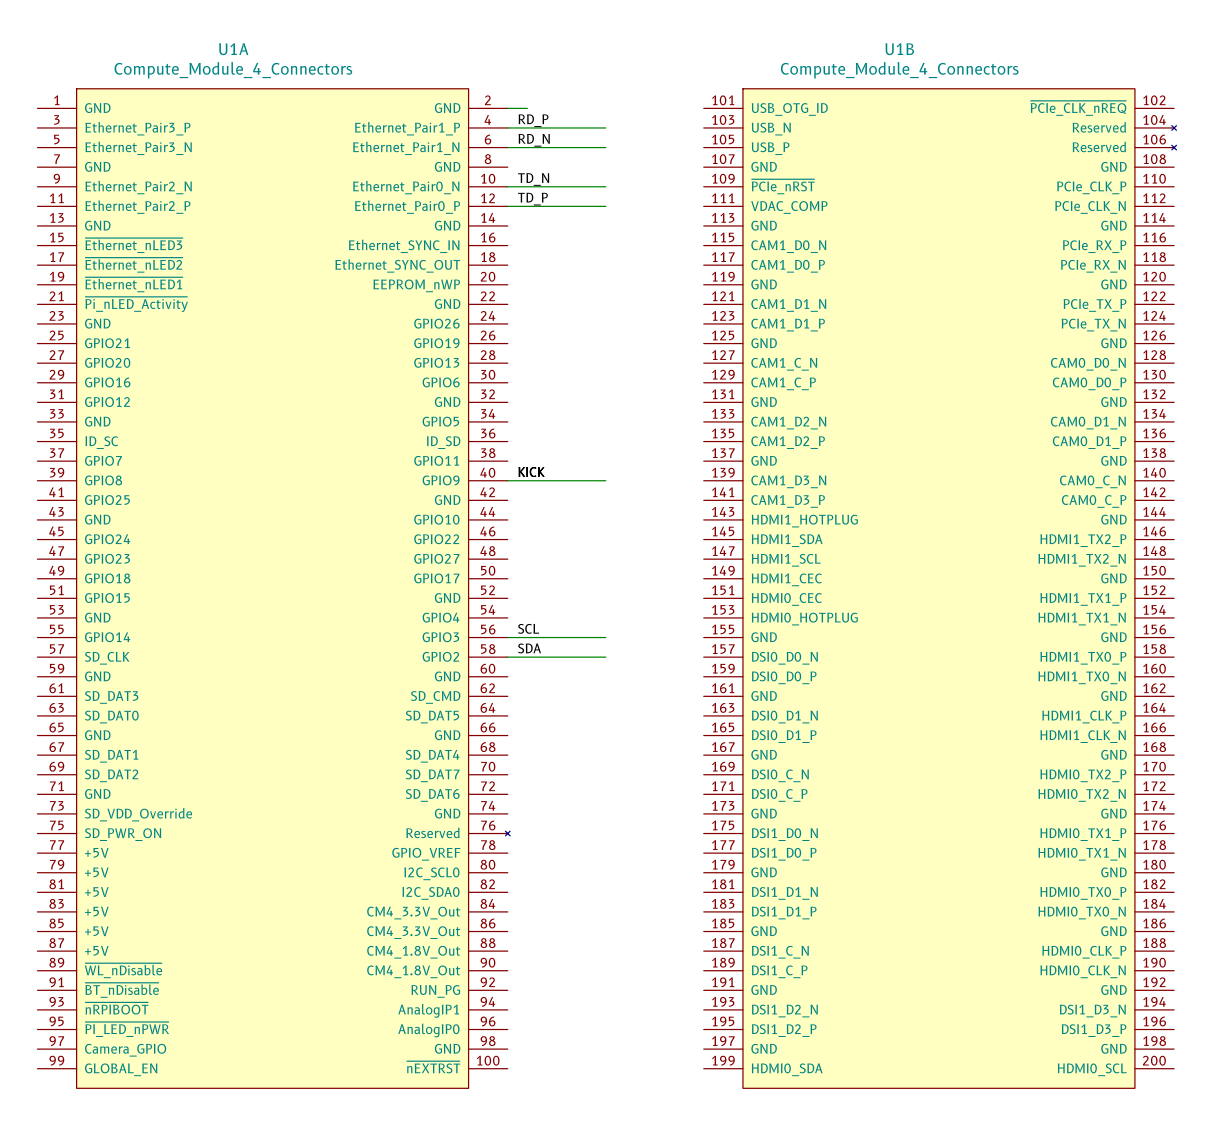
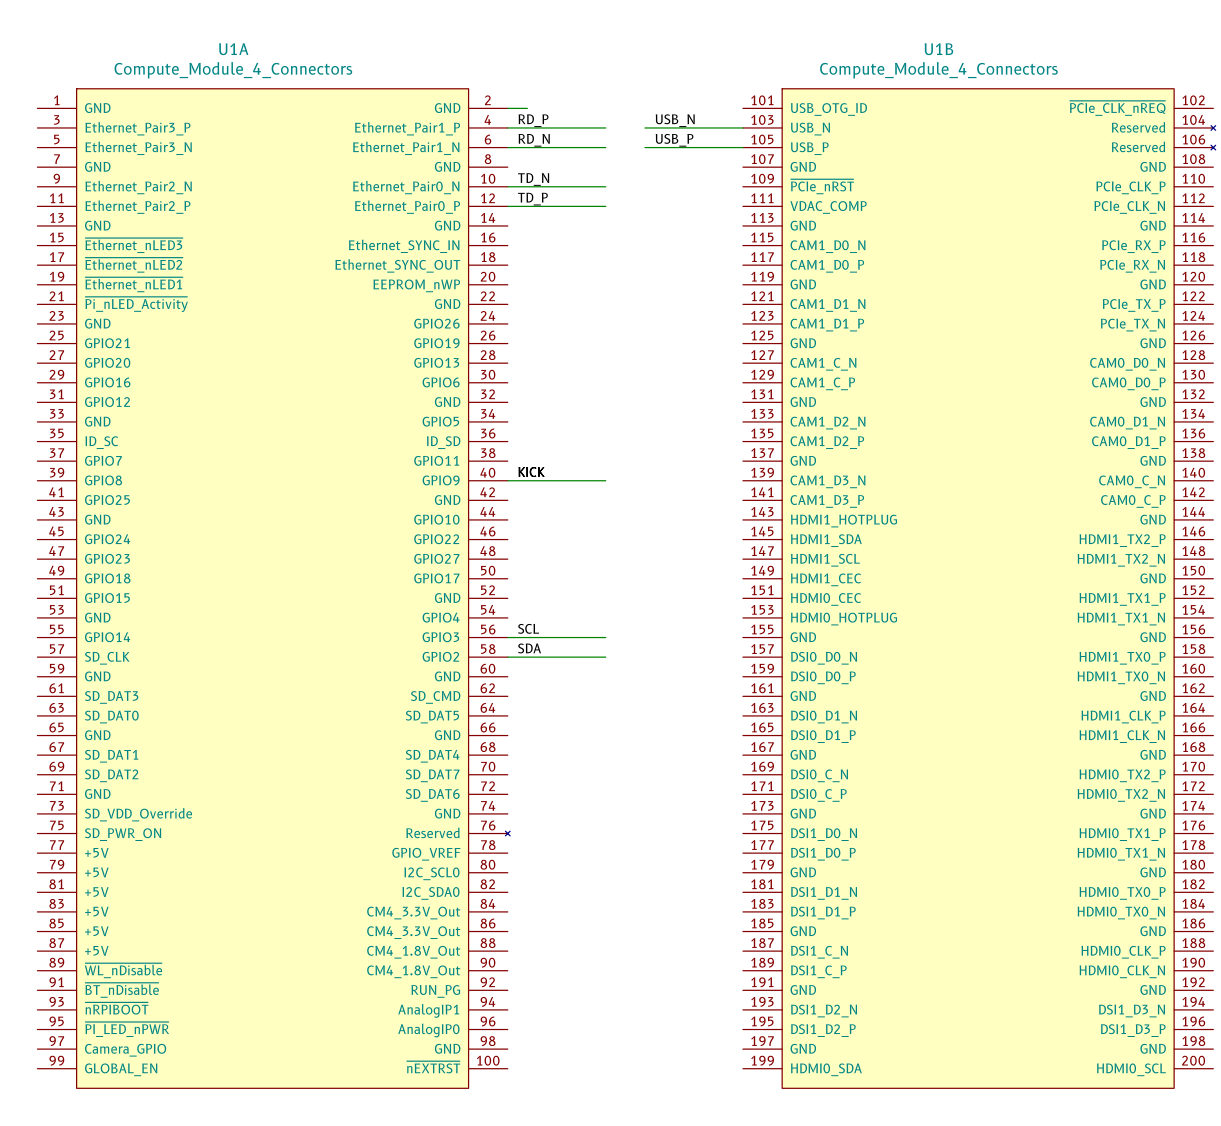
label: none -> USB_N (675, 120)
wire: none -> (644, 127) (742, 127)
label: none -> USB_P (674, 140)
wire: none -> (644, 147) (742, 147)
U1B position: (940, 588) -> (979, 588)

